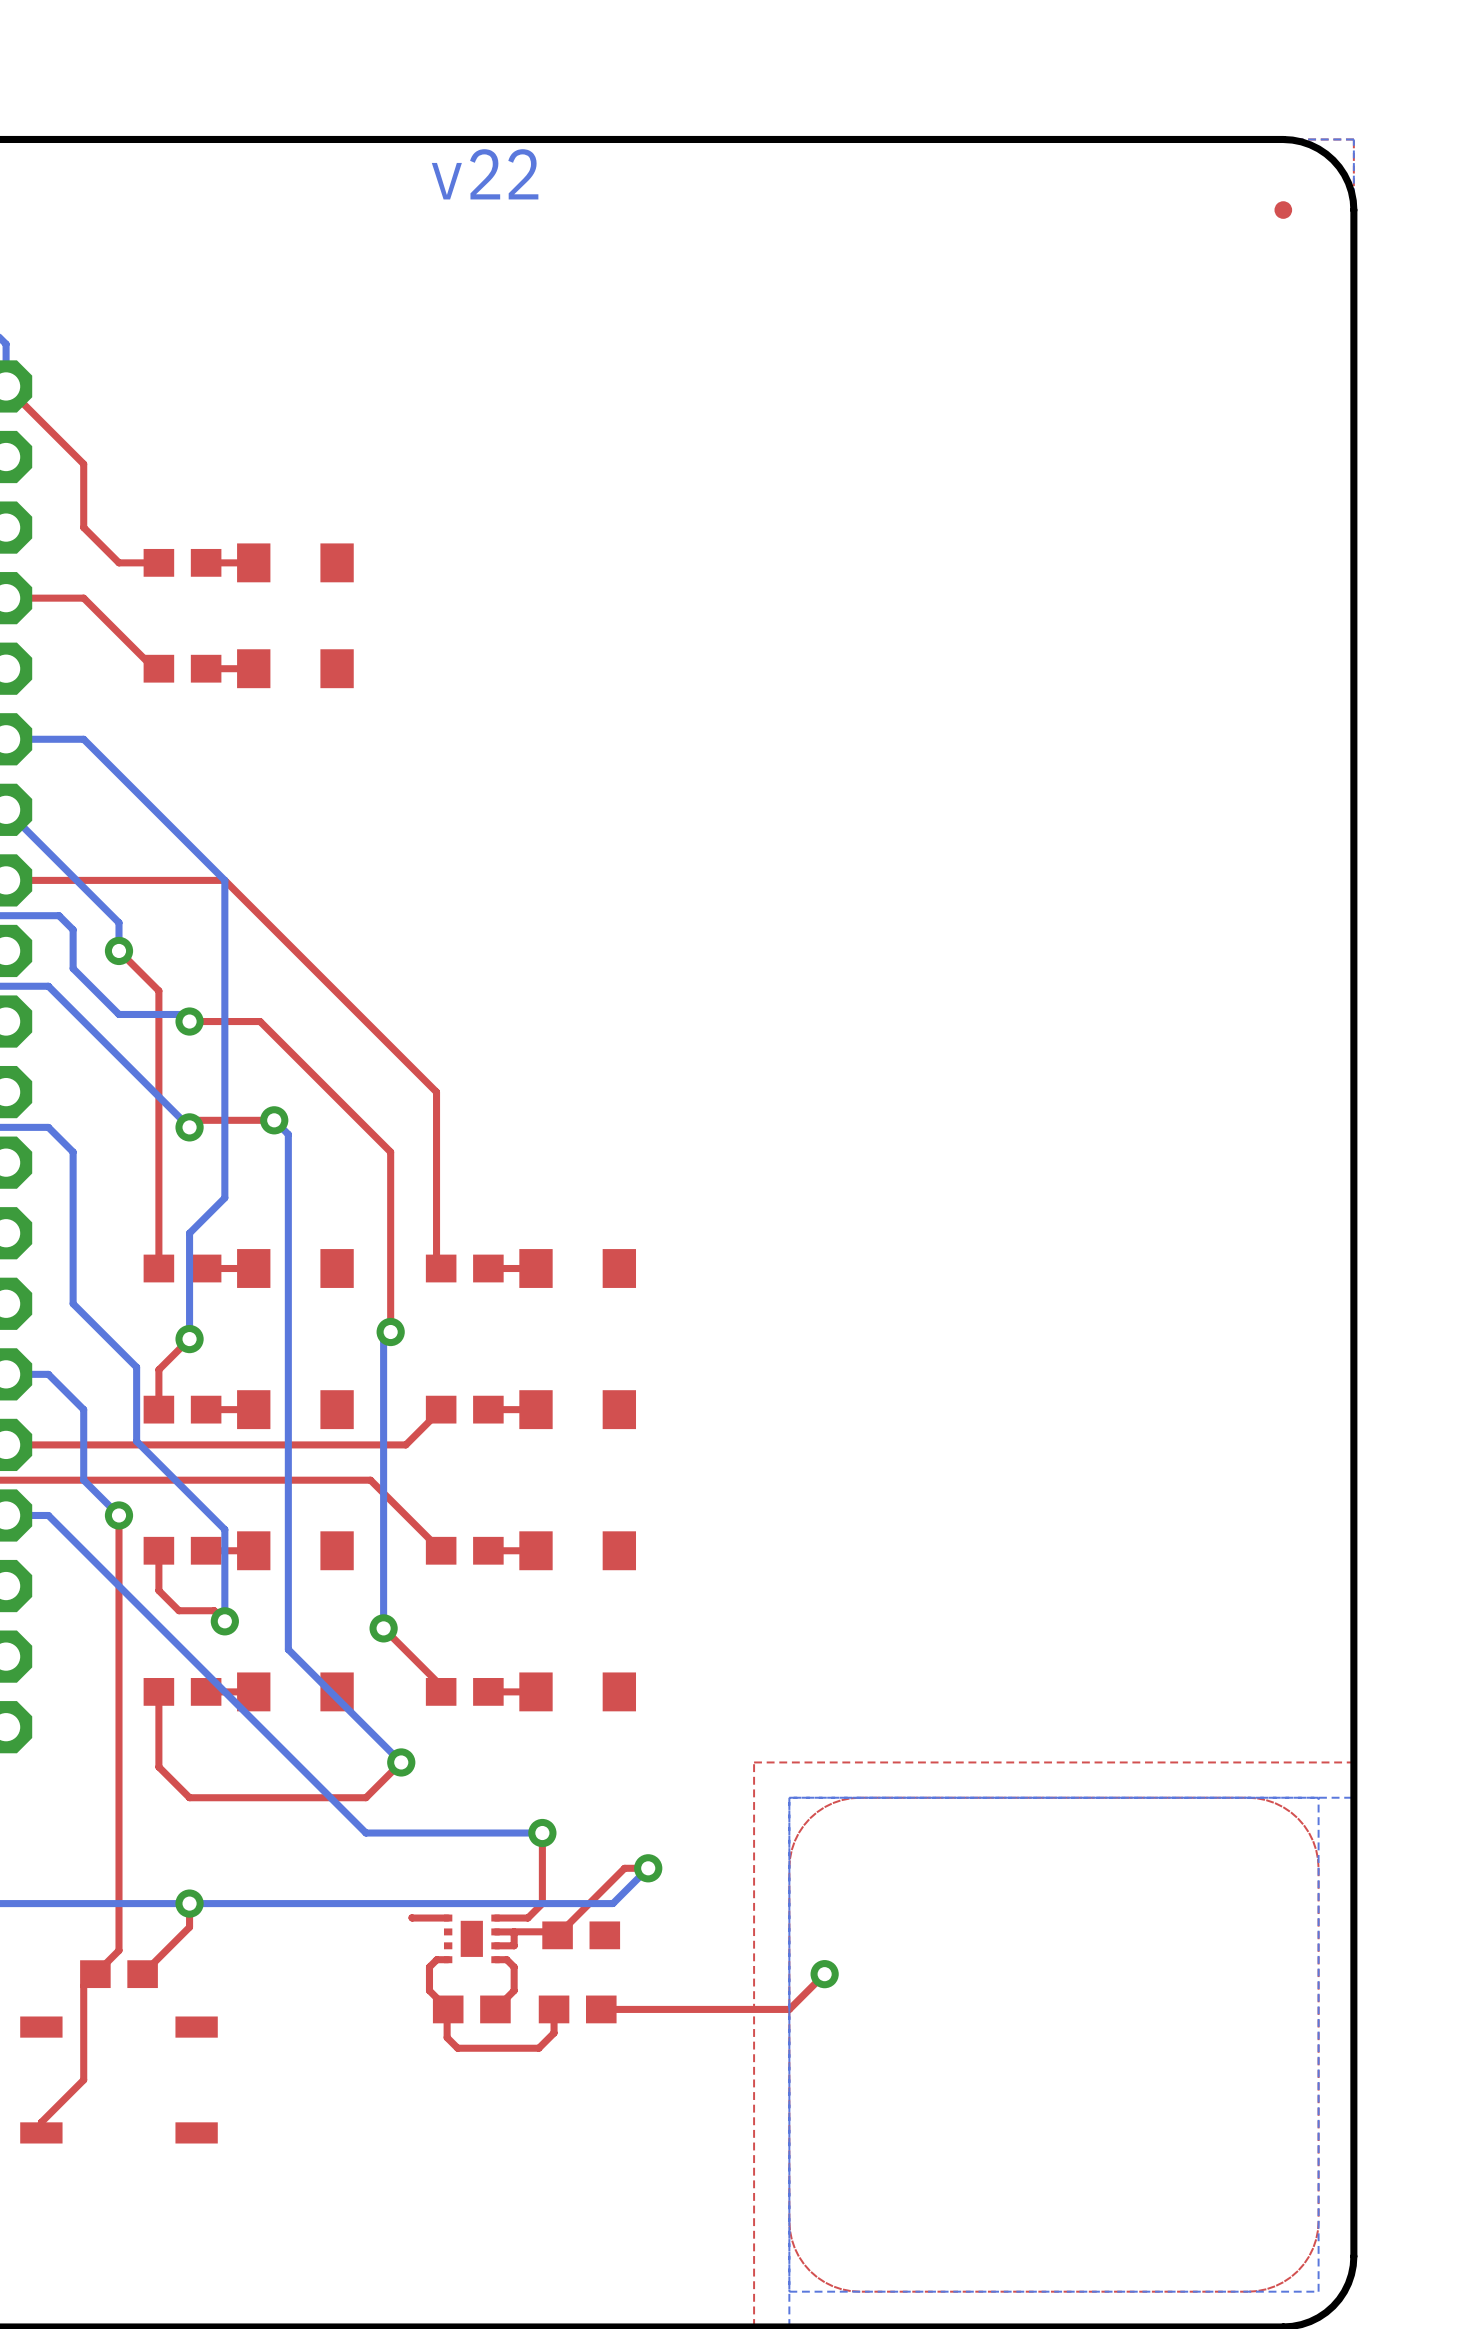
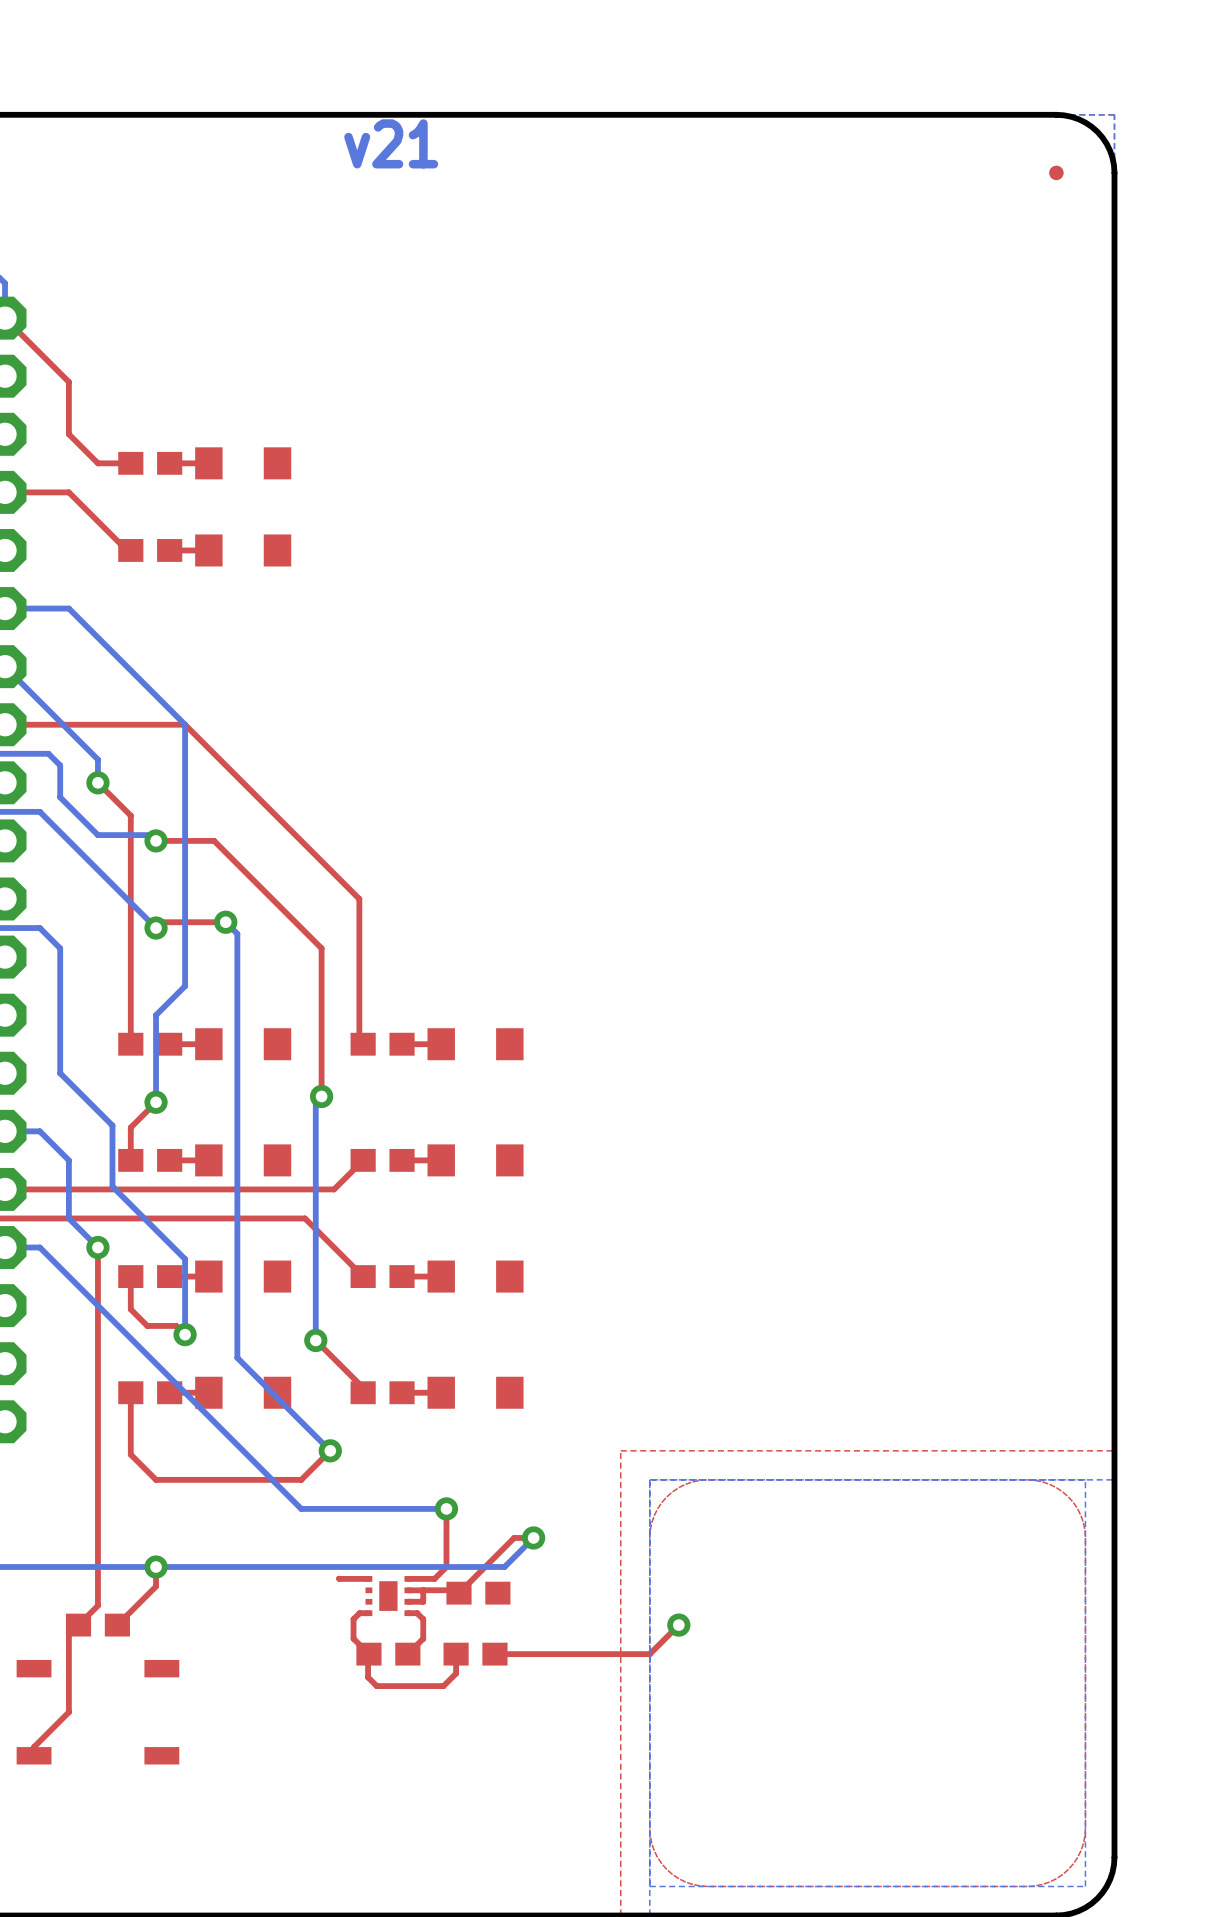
text: v22 (485, 174) -> v21 (391, 143)

